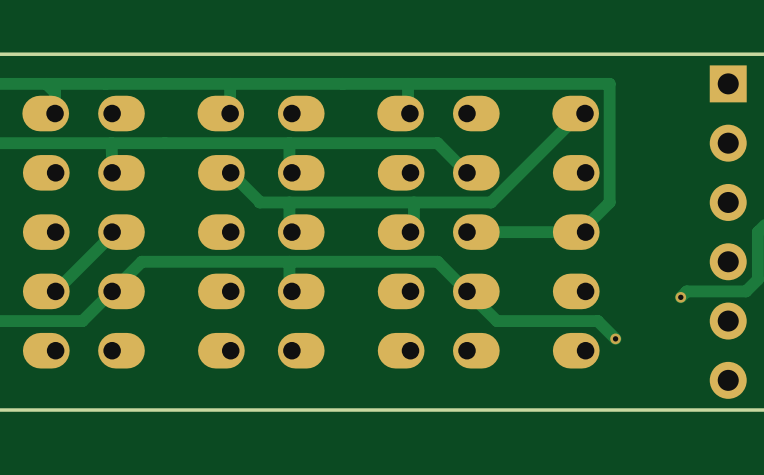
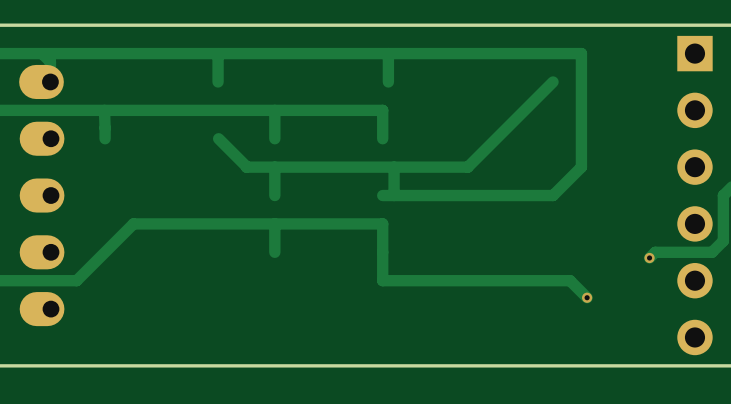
track: (402, 143) (437, 143) (466, 172) -> (382, 110) (382, 138)
track: (112, 232) (112, 234) (55, 291) -> none
part: (171, 232) -> none
part: (351, 232) -> none
track: none -> (444, 195) (382, 195)
part: (526, 232) -> none
track: (402, 261) (437, 261) (496, 321) -> (382, 223) (382, 280) (473, 280)

